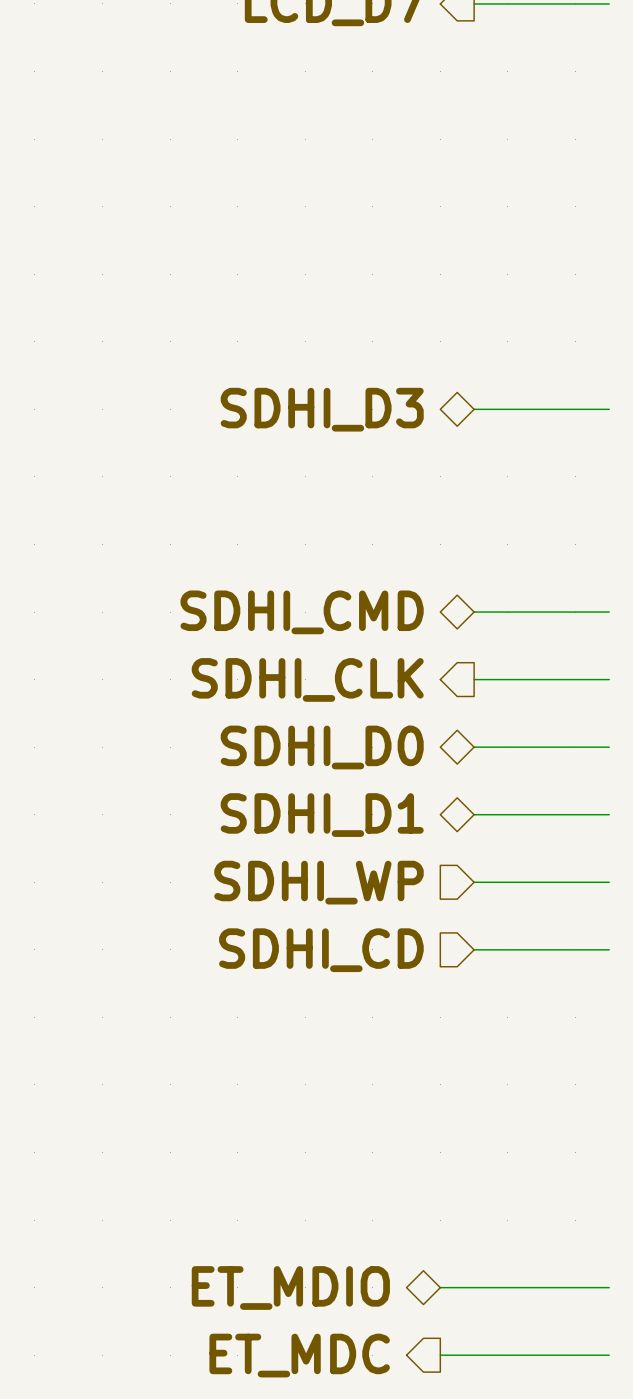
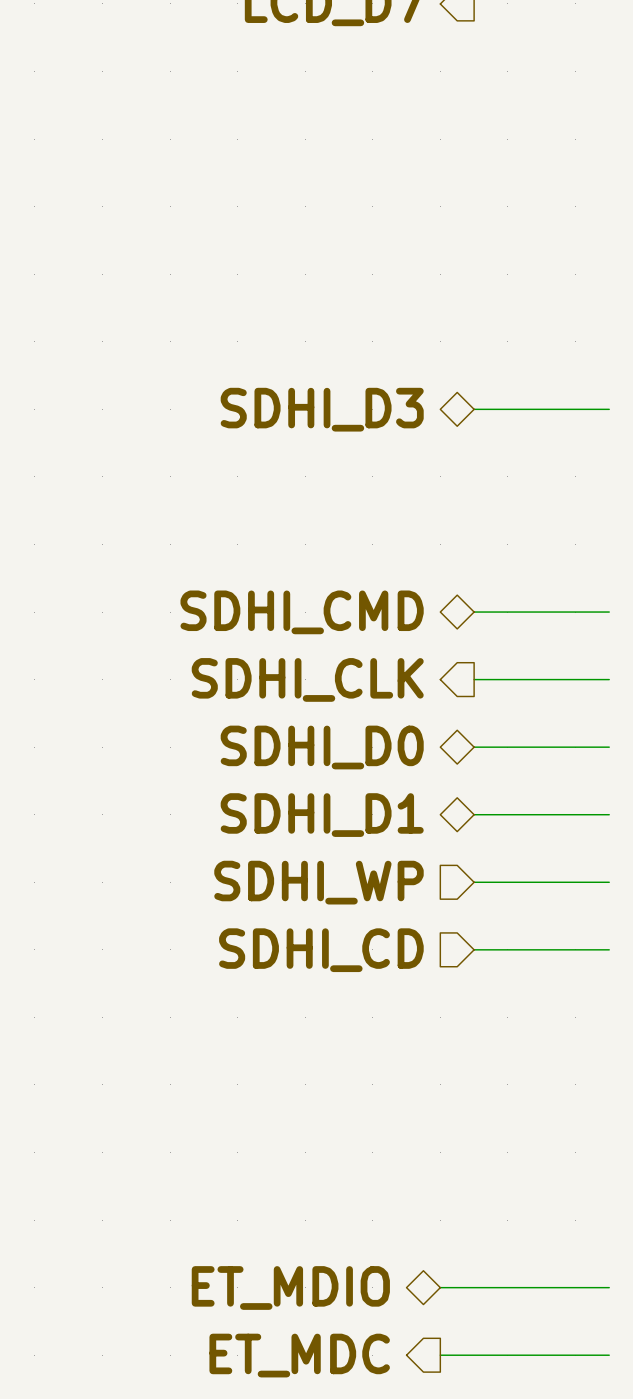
wire: (474, 3) (609, 3) -> none

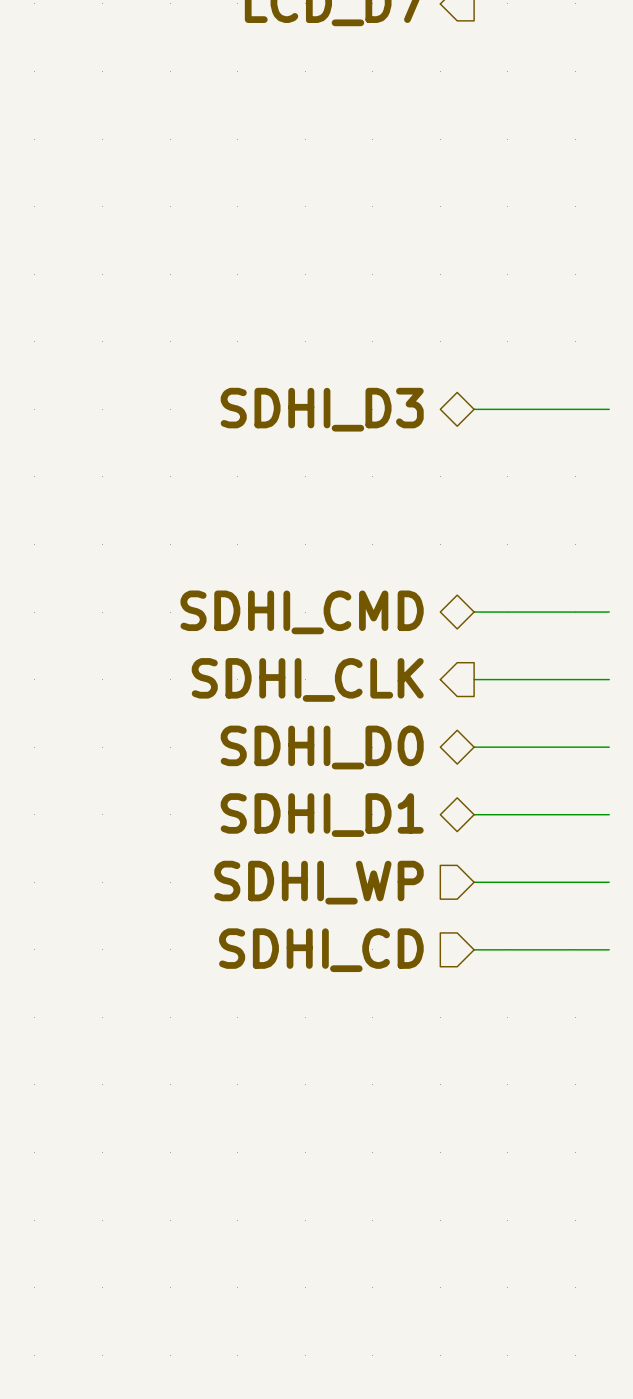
hierarchical label: ET_MDIO (290, 1287) -> none
wire: (440, 1287) (609, 1287) -> none
hierarchical label: ET_MDC (299, 1355) -> none
wire: (440, 1355) (609, 1355) -> none

